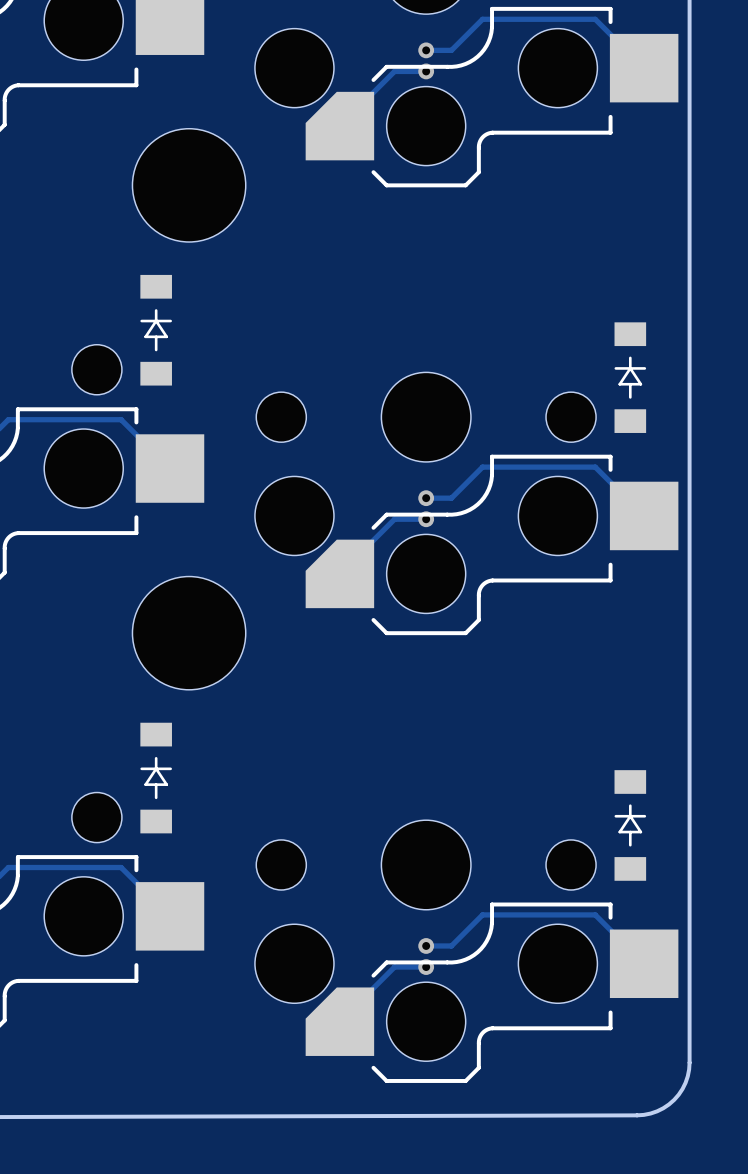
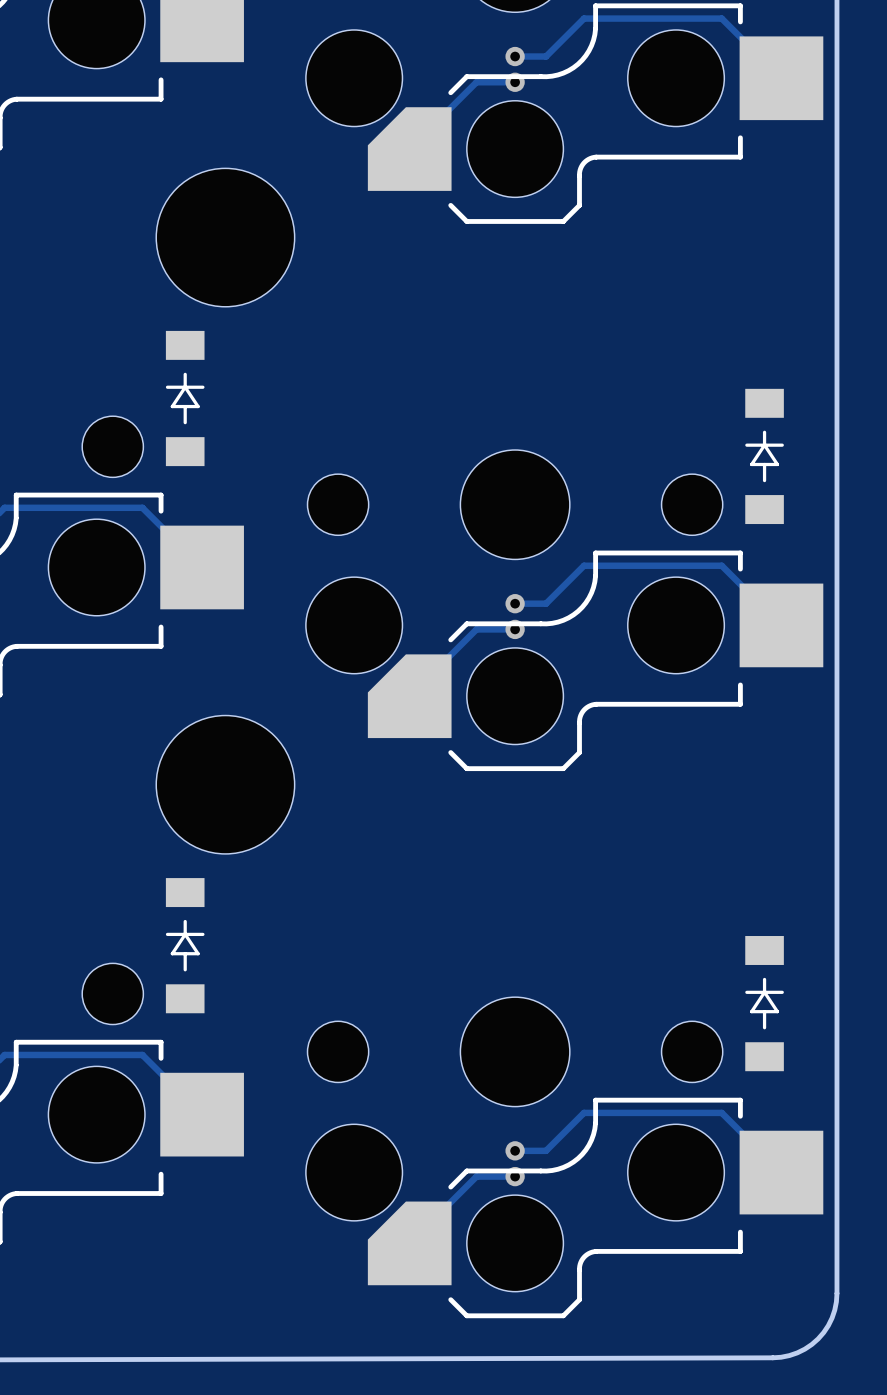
part position: (189, 185) -> (225, 237)
part position: (189, 633) -> (225, 784)

